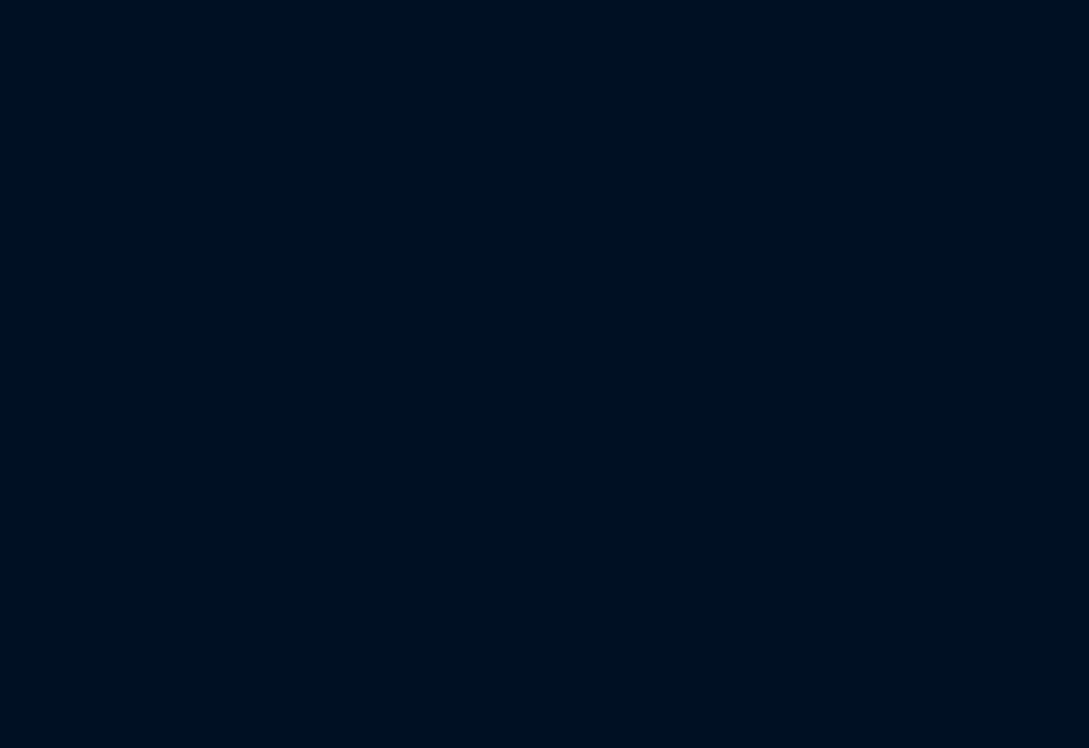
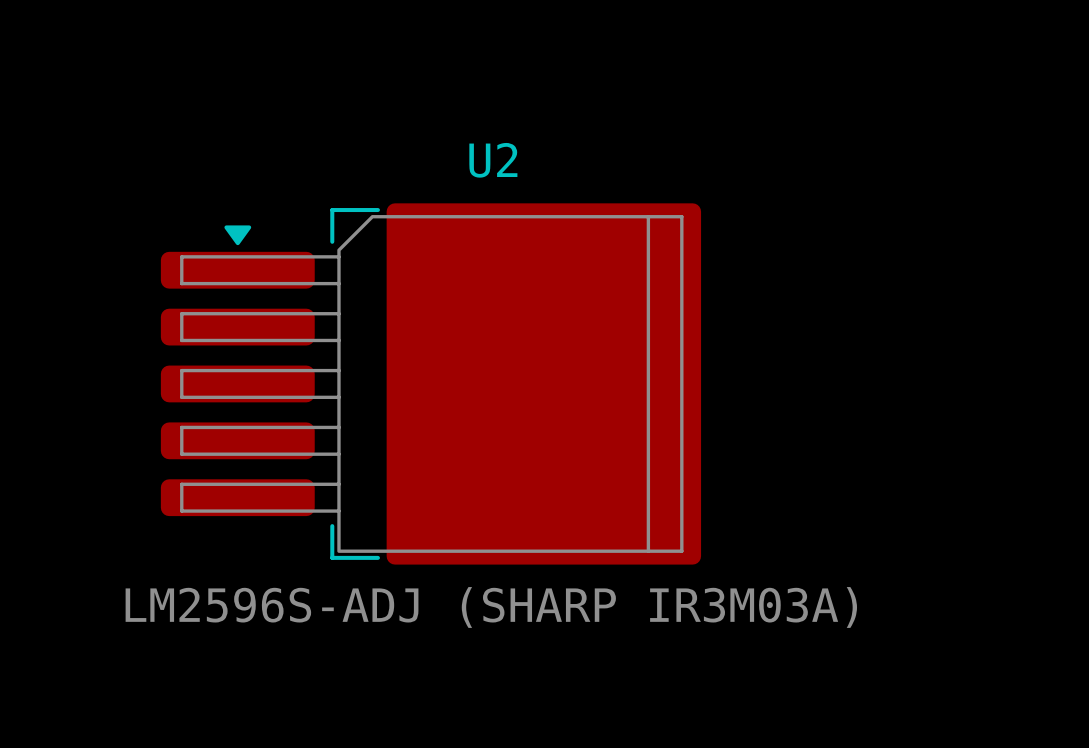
U2: none -> LM2596S-ADJ (SHARP IR3M03A) (430, 383)

